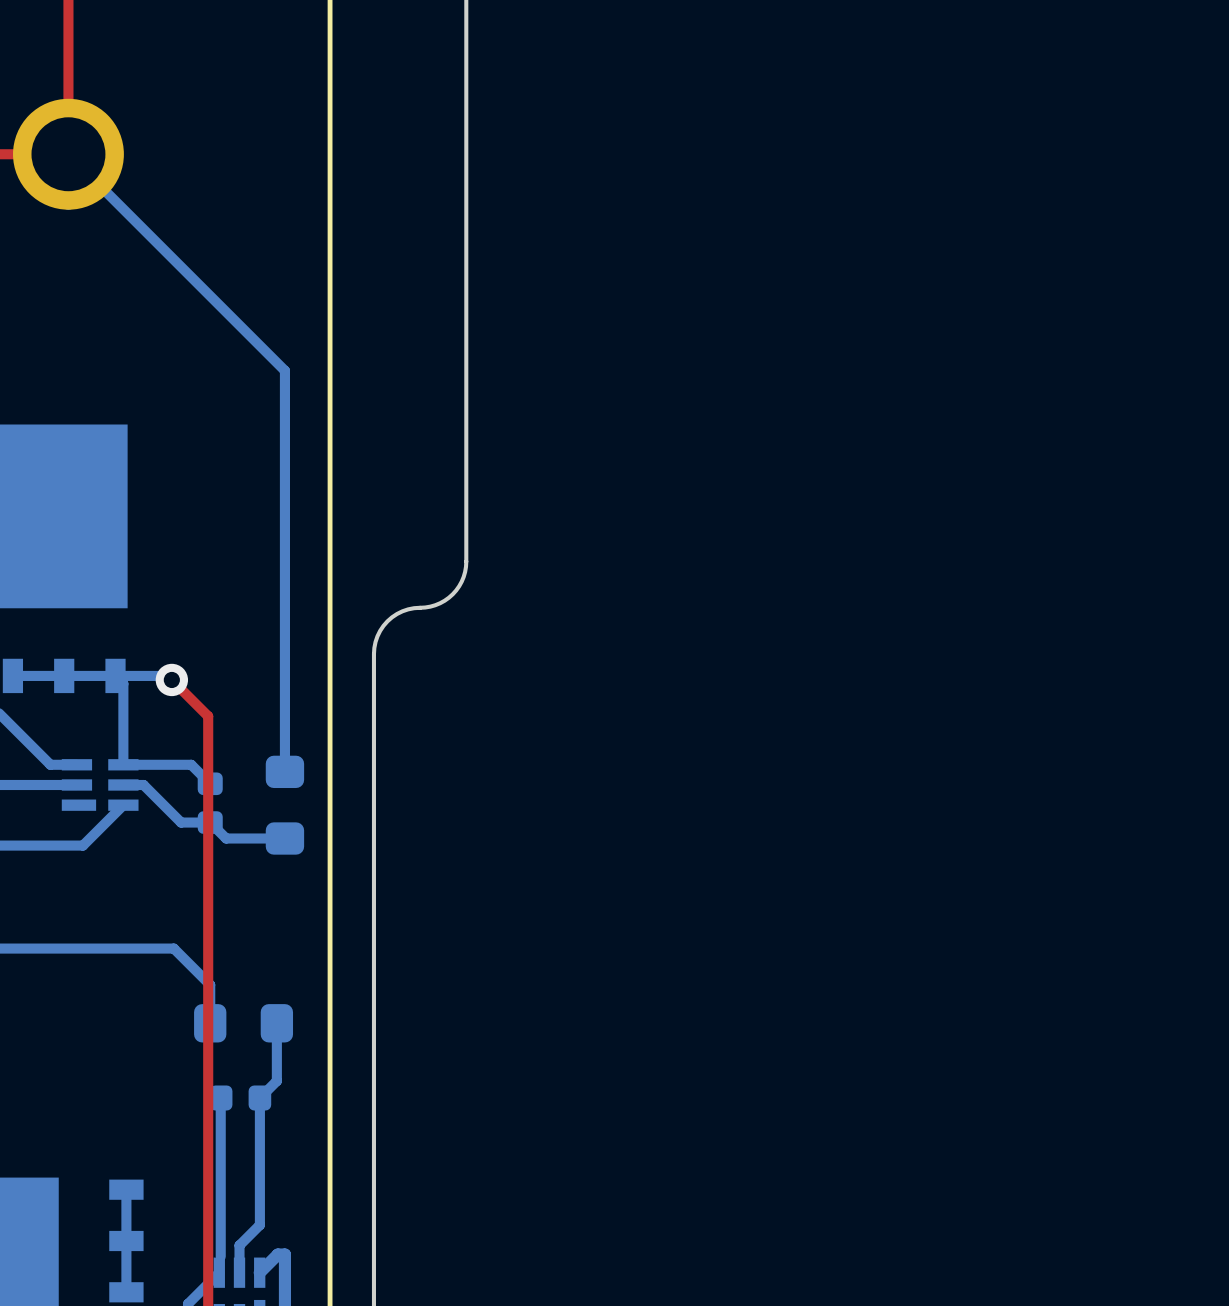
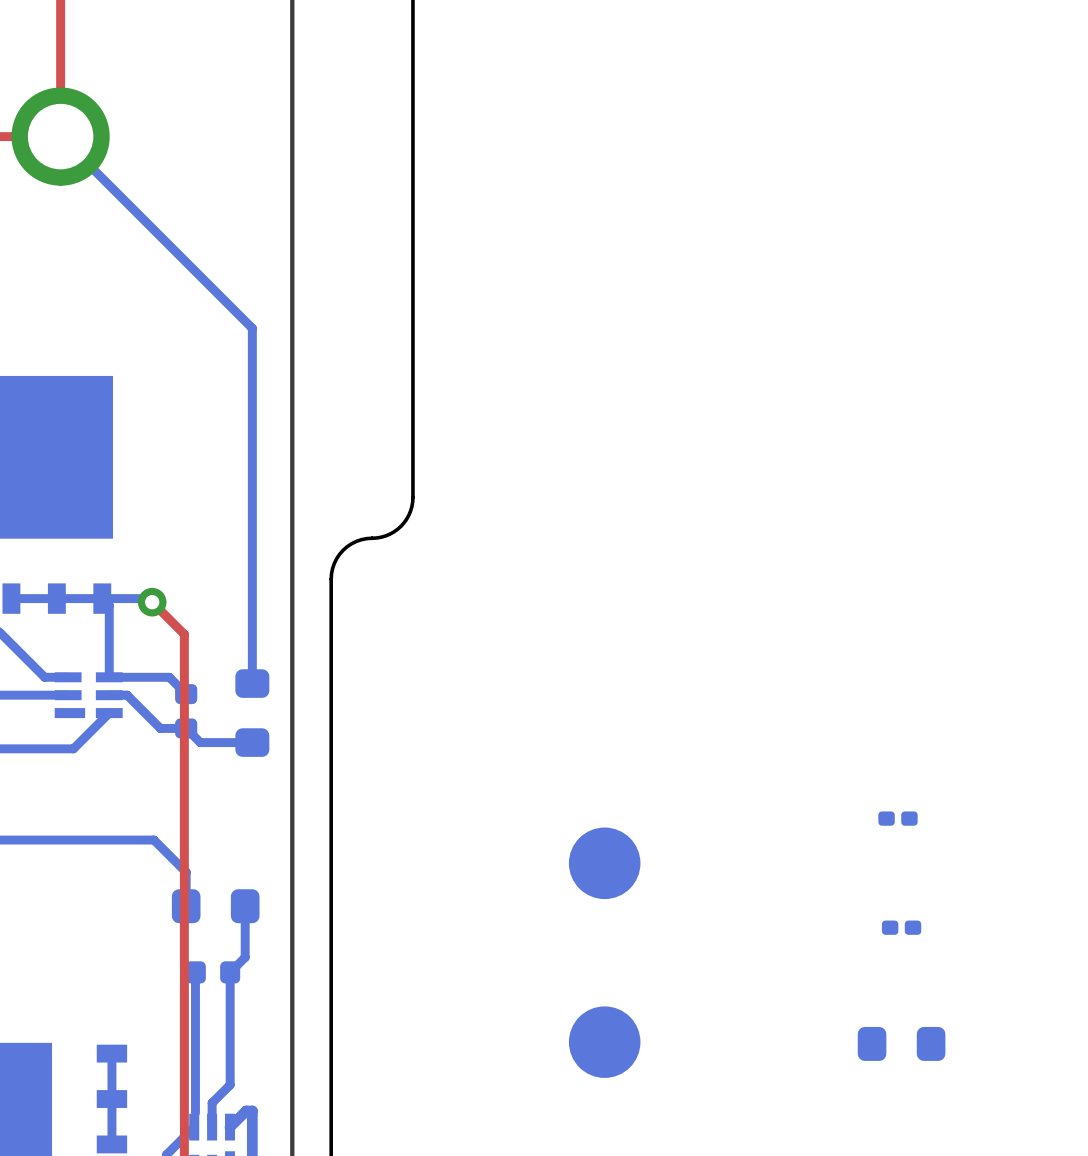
part: none -> (897, 818)
part: none -> (604, 863)
part: none -> (901, 927)
part: none -> (604, 1042)
part: none -> (901, 1043)

